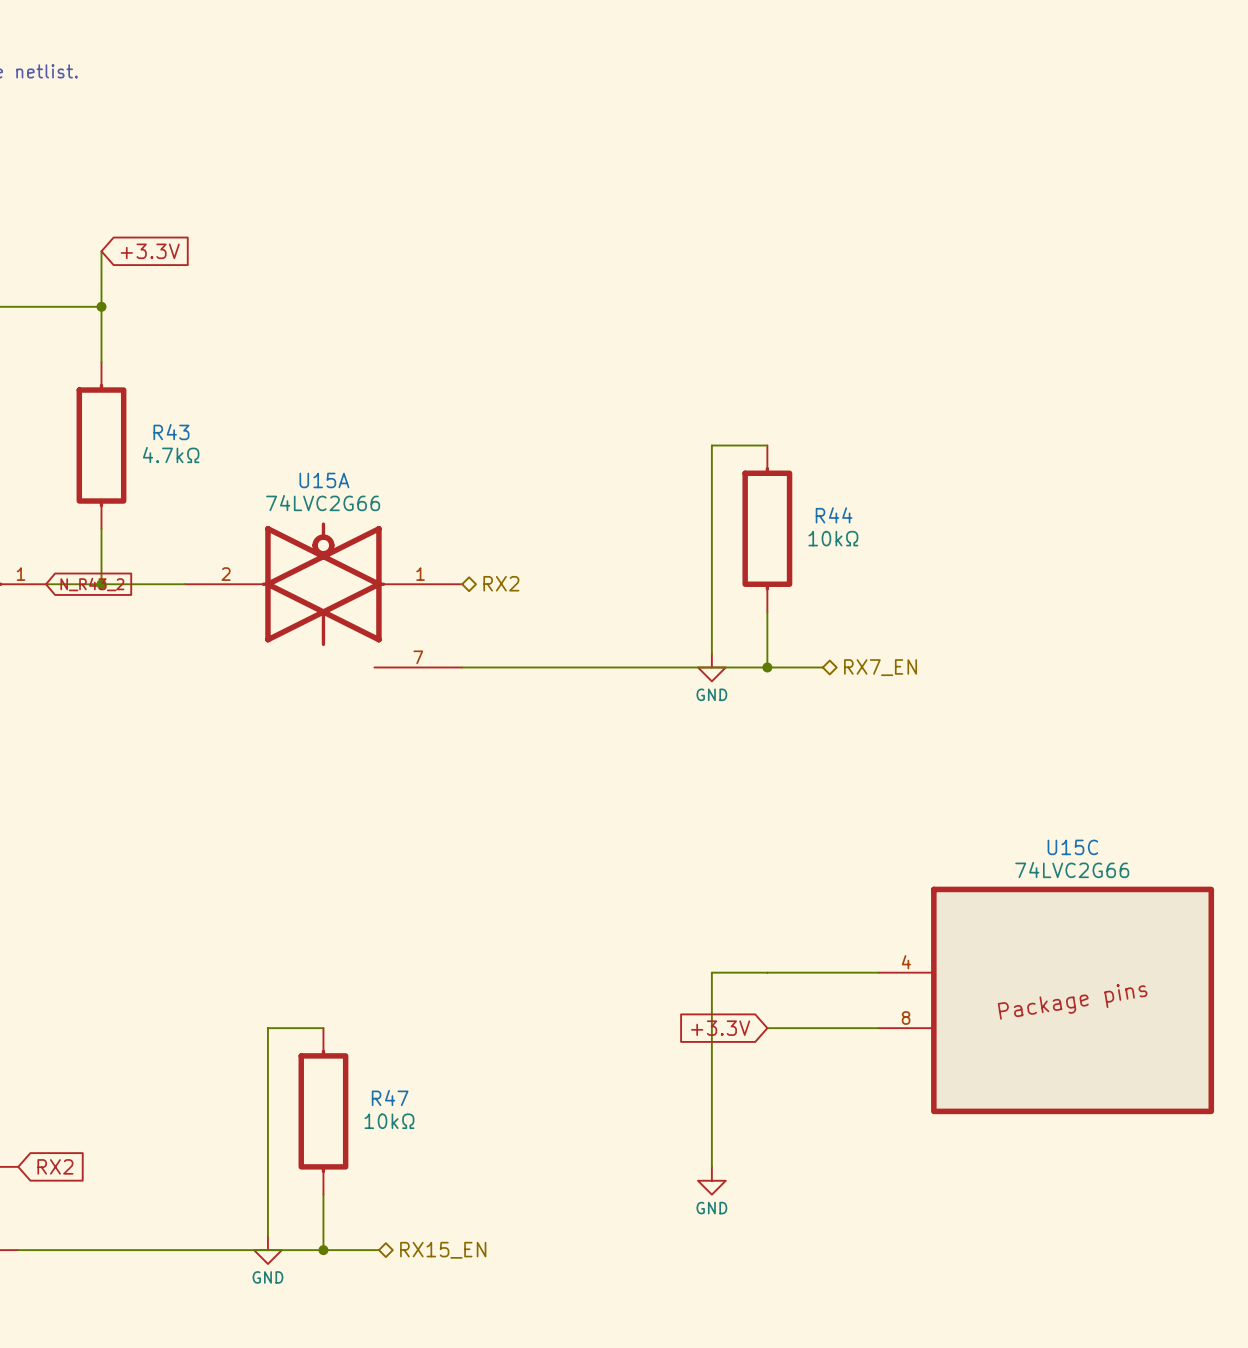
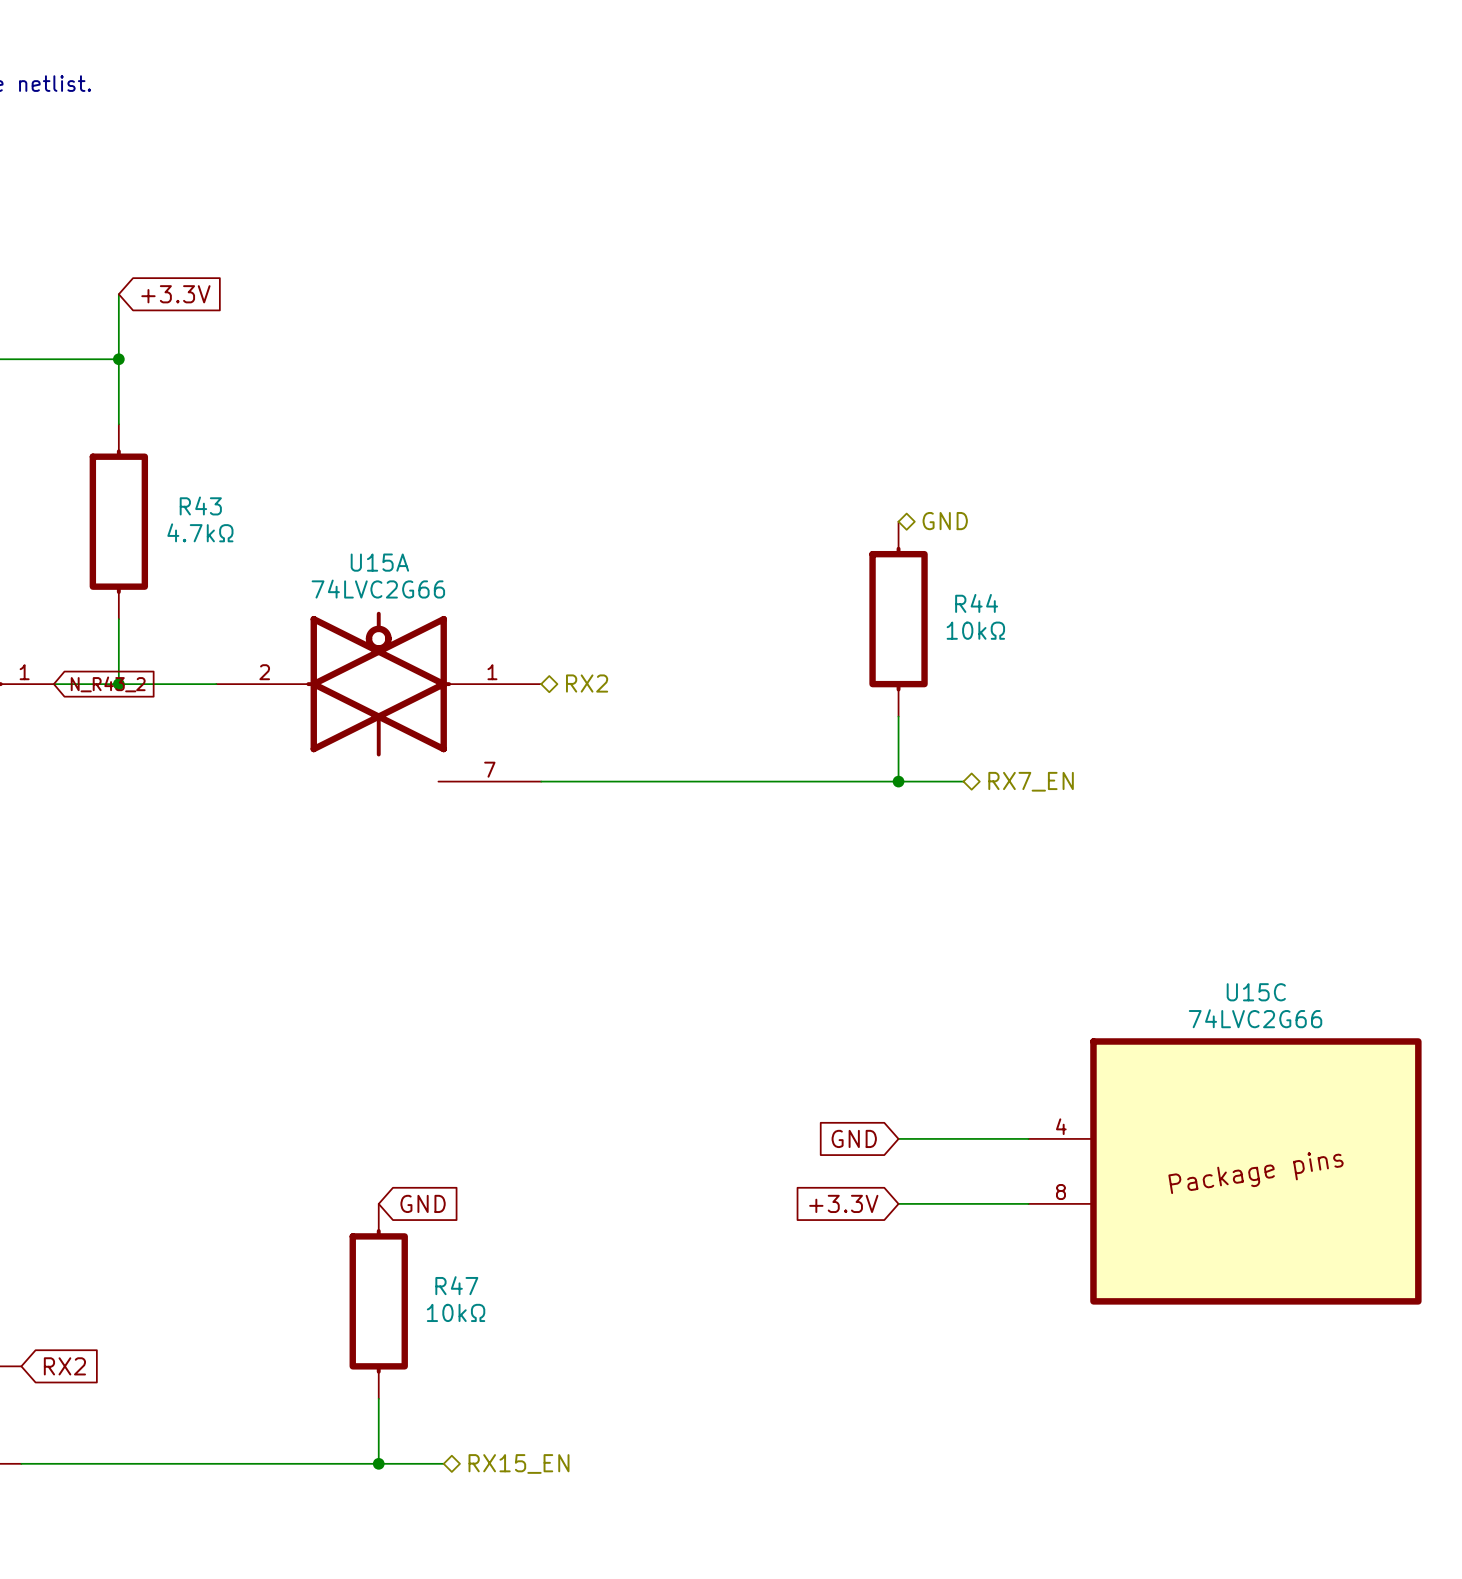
wire: (767, 445) (711, 445) (711, 653) -> none
hierarchical label: none -> GND (945, 521)
power symbol: GND (711, 667) -> none
global label: none -> GND (854, 1138)
wire: (767, 972) (711, 972) (711, 1166) -> none
wire: (323, 1028) (267, 1028) (267, 1236) -> none
global label: none -> GND (423, 1203)
power symbol: GND (711, 1180) -> none
power symbol: GND (267, 1250) -> none

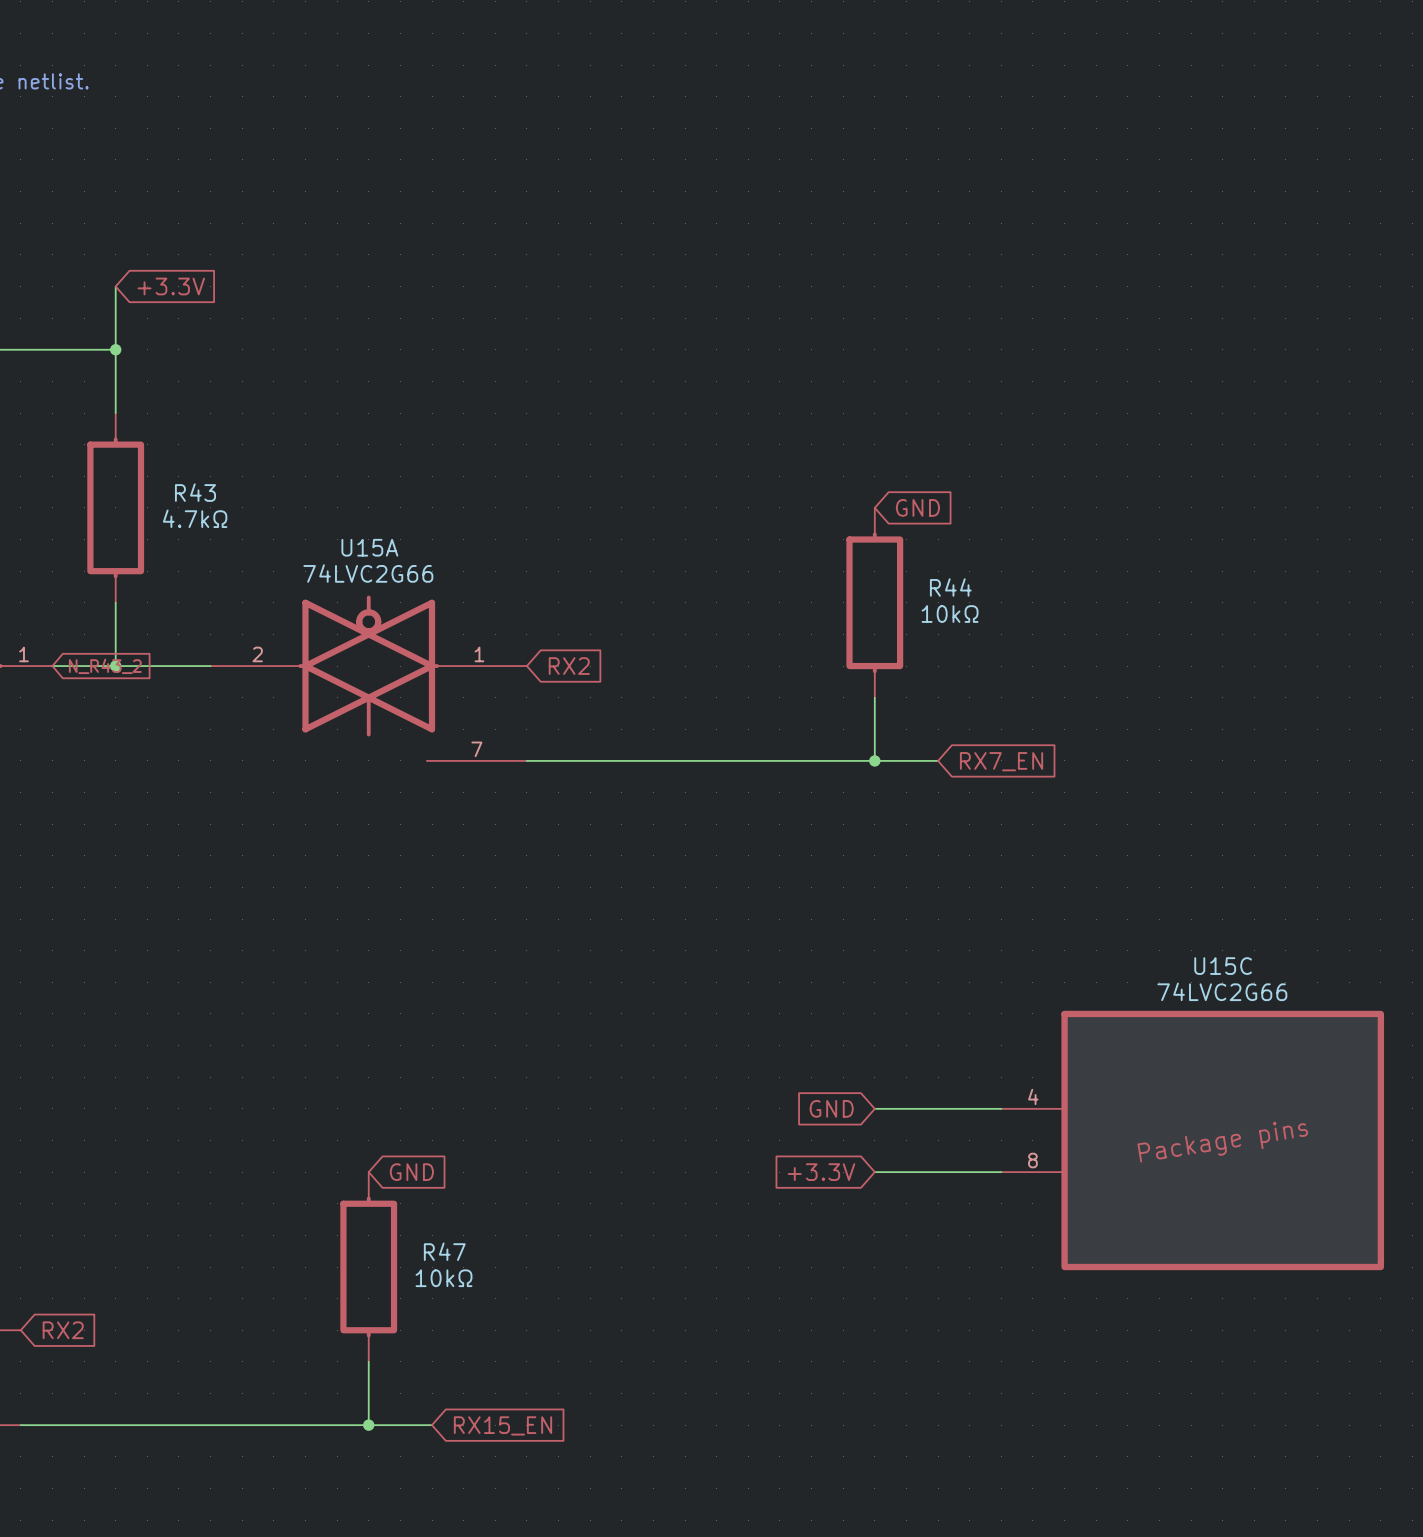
global label: none -> GND (917, 507)
hierarchical label: GND (945, 521) -> none
hierarchical label: RX2 (587, 683) -> none
global label: none -> RX2 (569, 666)
hierarchical label: RX7_EN (1031, 781) -> none
global label: none -> RX7_EN (1001, 761)
hierarchical label: RX15_EN (519, 1463) -> none
global label: none -> RX15_EN (503, 1425)

